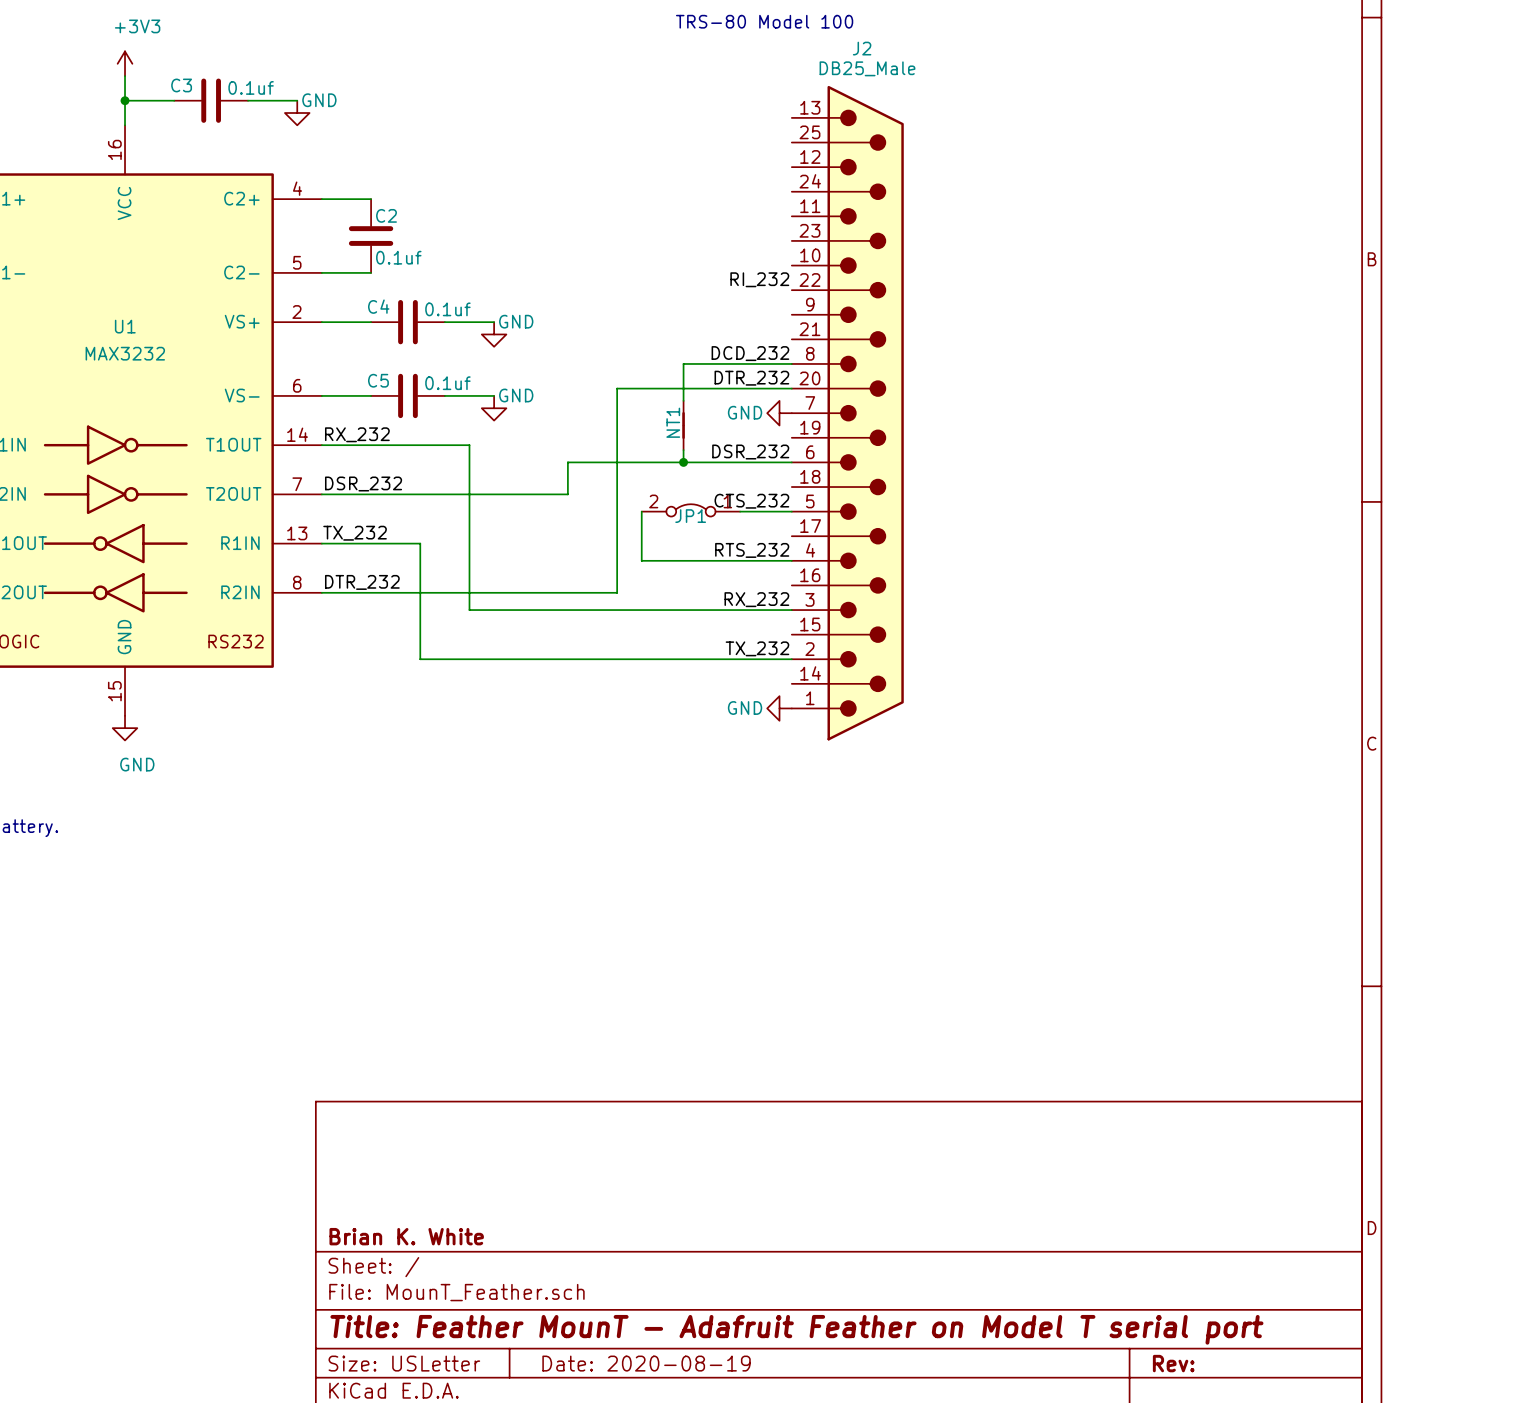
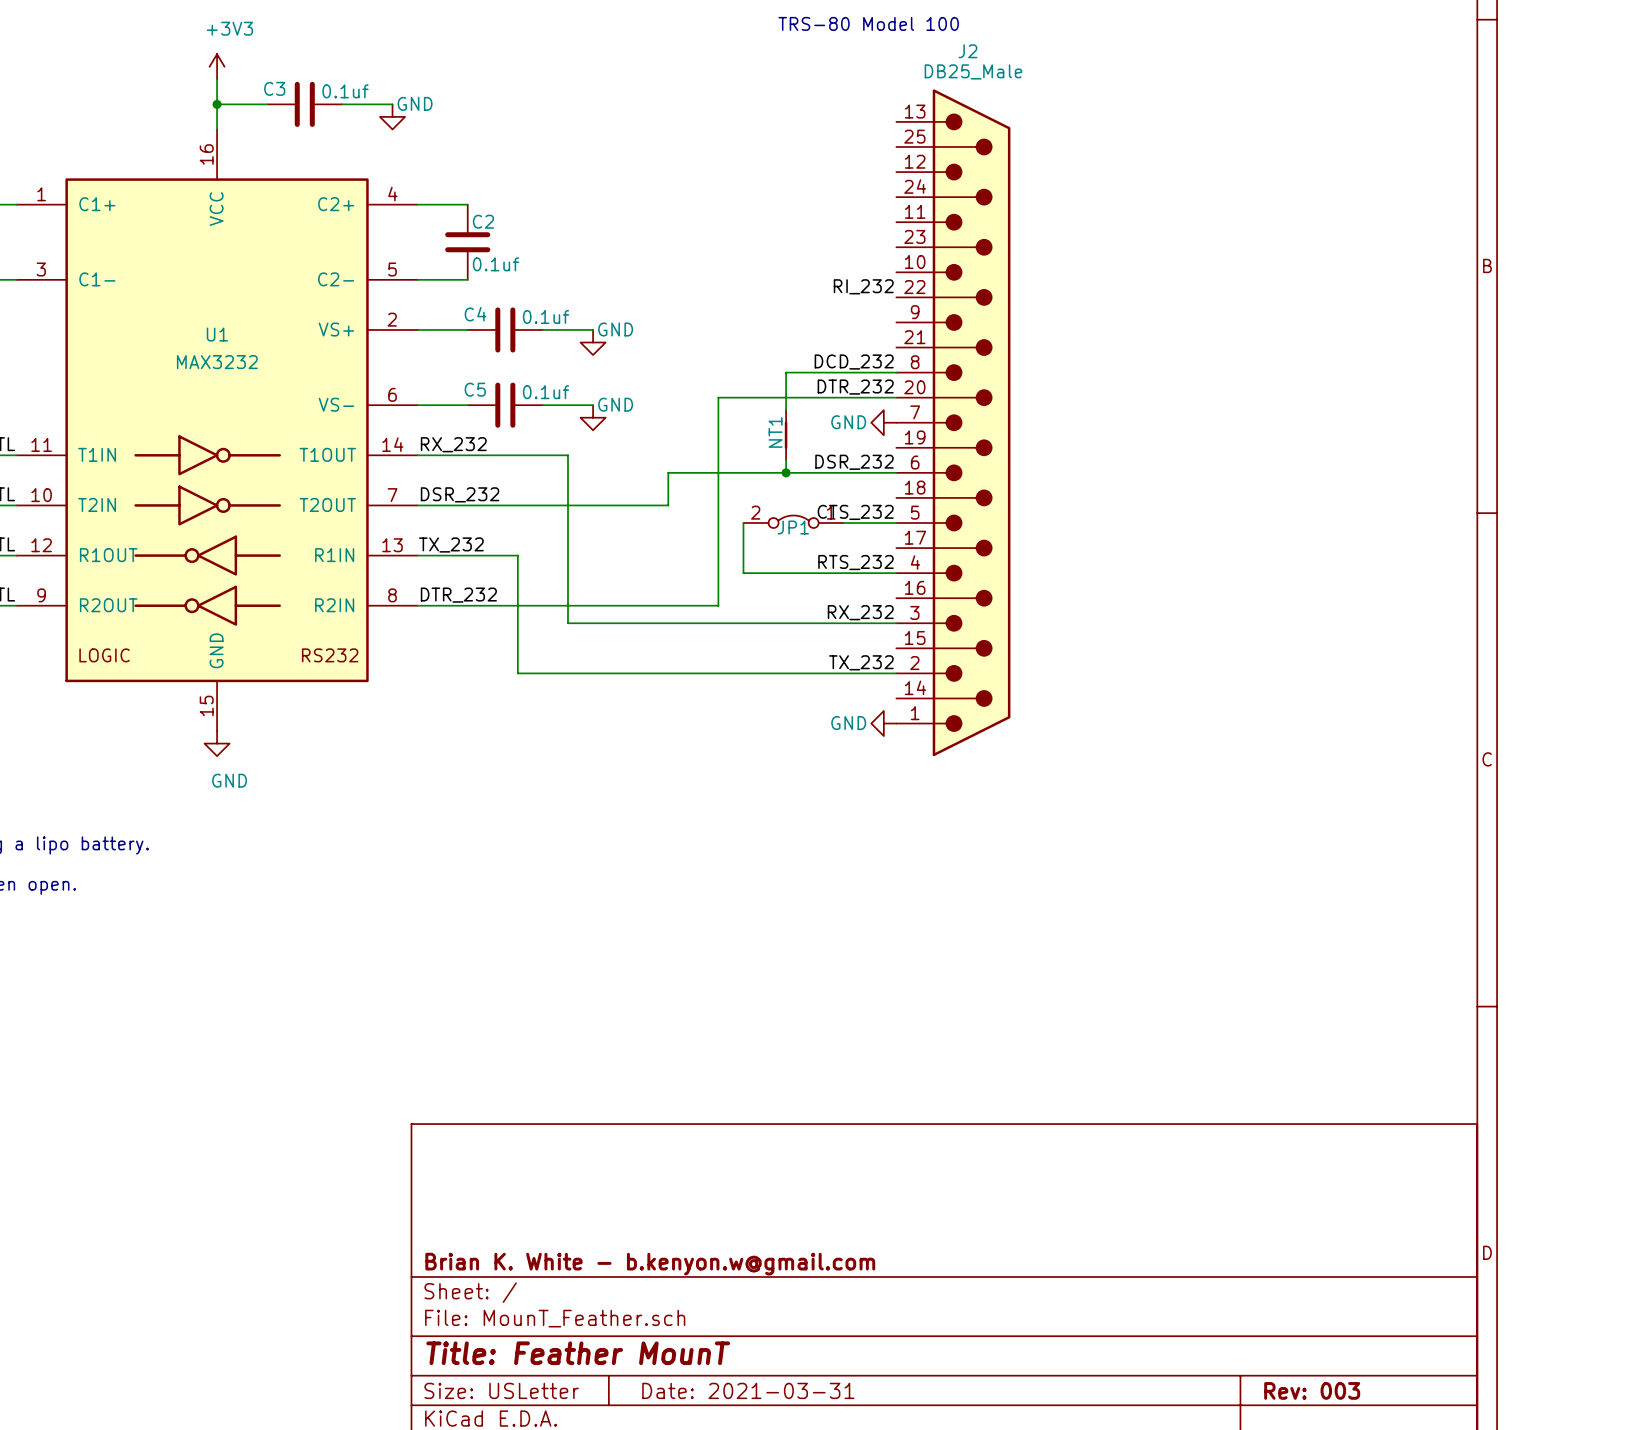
title block: Brian K. White (406, 1236) -> Brian K. White - b.kenyon.w@gmail.com (650, 1264)
title block: Title: Feather MounT - Adafruit Feather on Model T serial port (796, 1329) -> Title: Feather MounT (578, 1353)
title block: Date: 2020-08-19 (646, 1363) -> Date: 2021-03-31 (748, 1390)
title block: Rev: (1173, 1363) -> Rev: 003 (1312, 1390)

